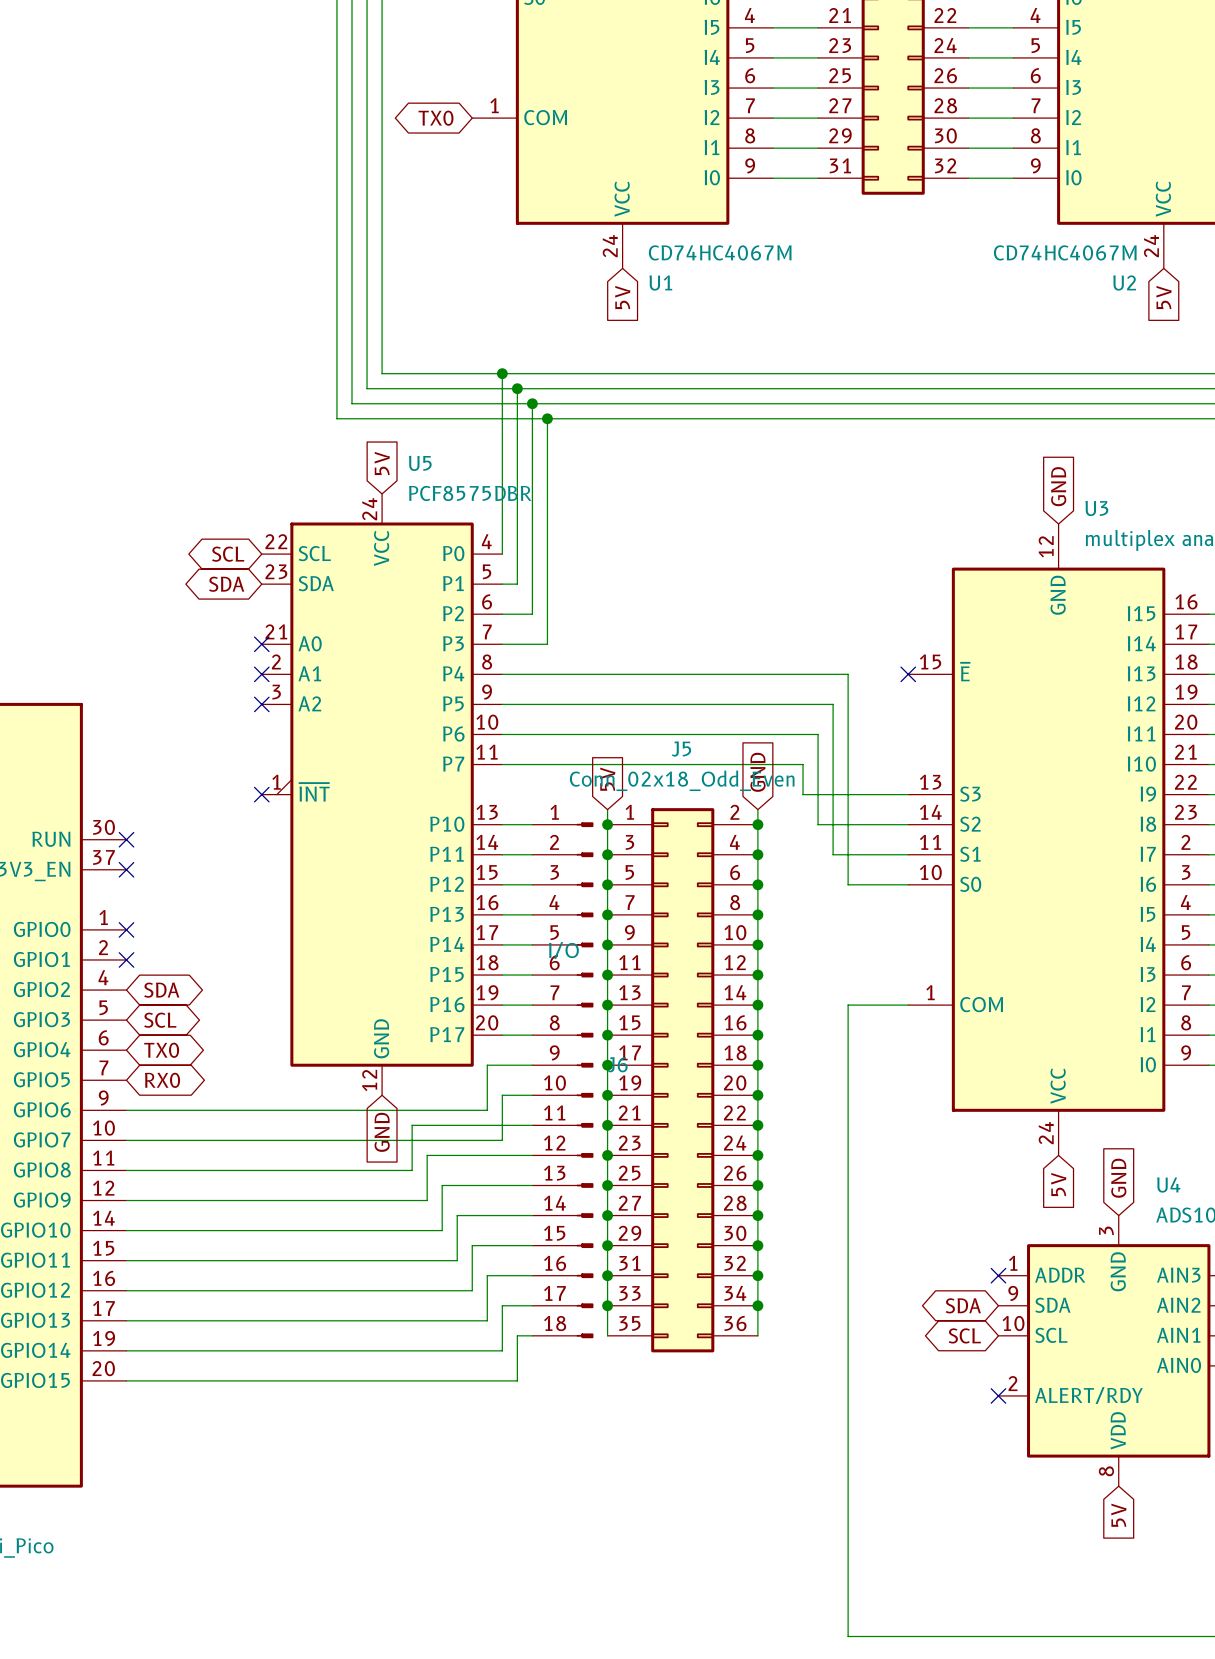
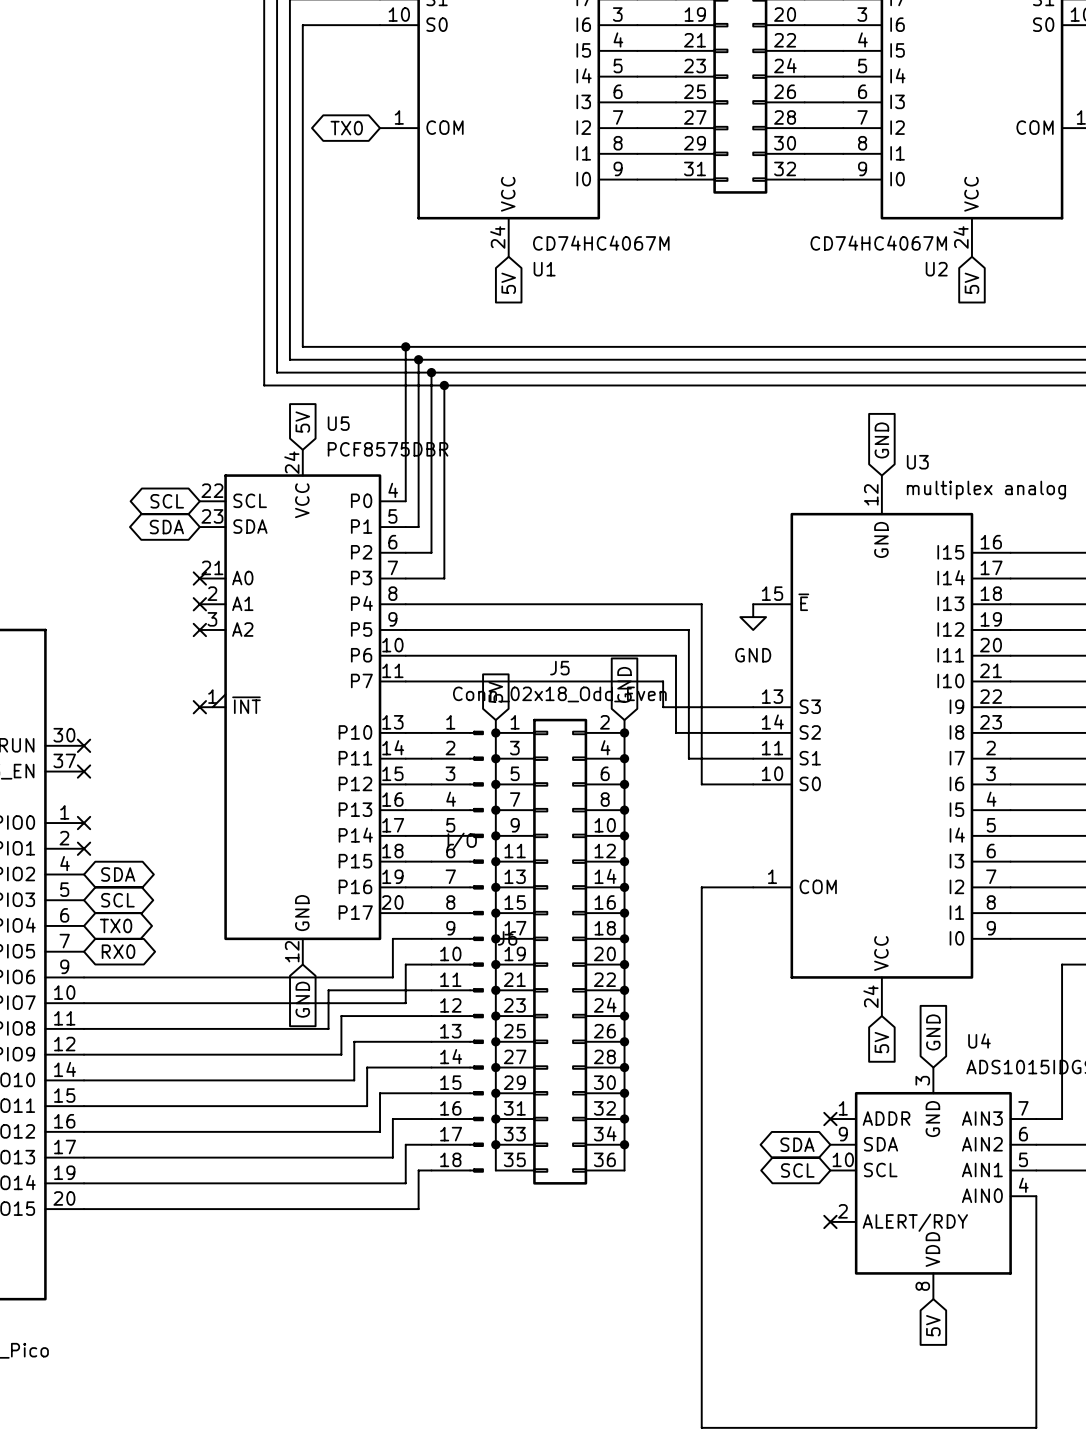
no-connect mark: (908, 674) -> none
power symbol: none -> GND (753, 617)

